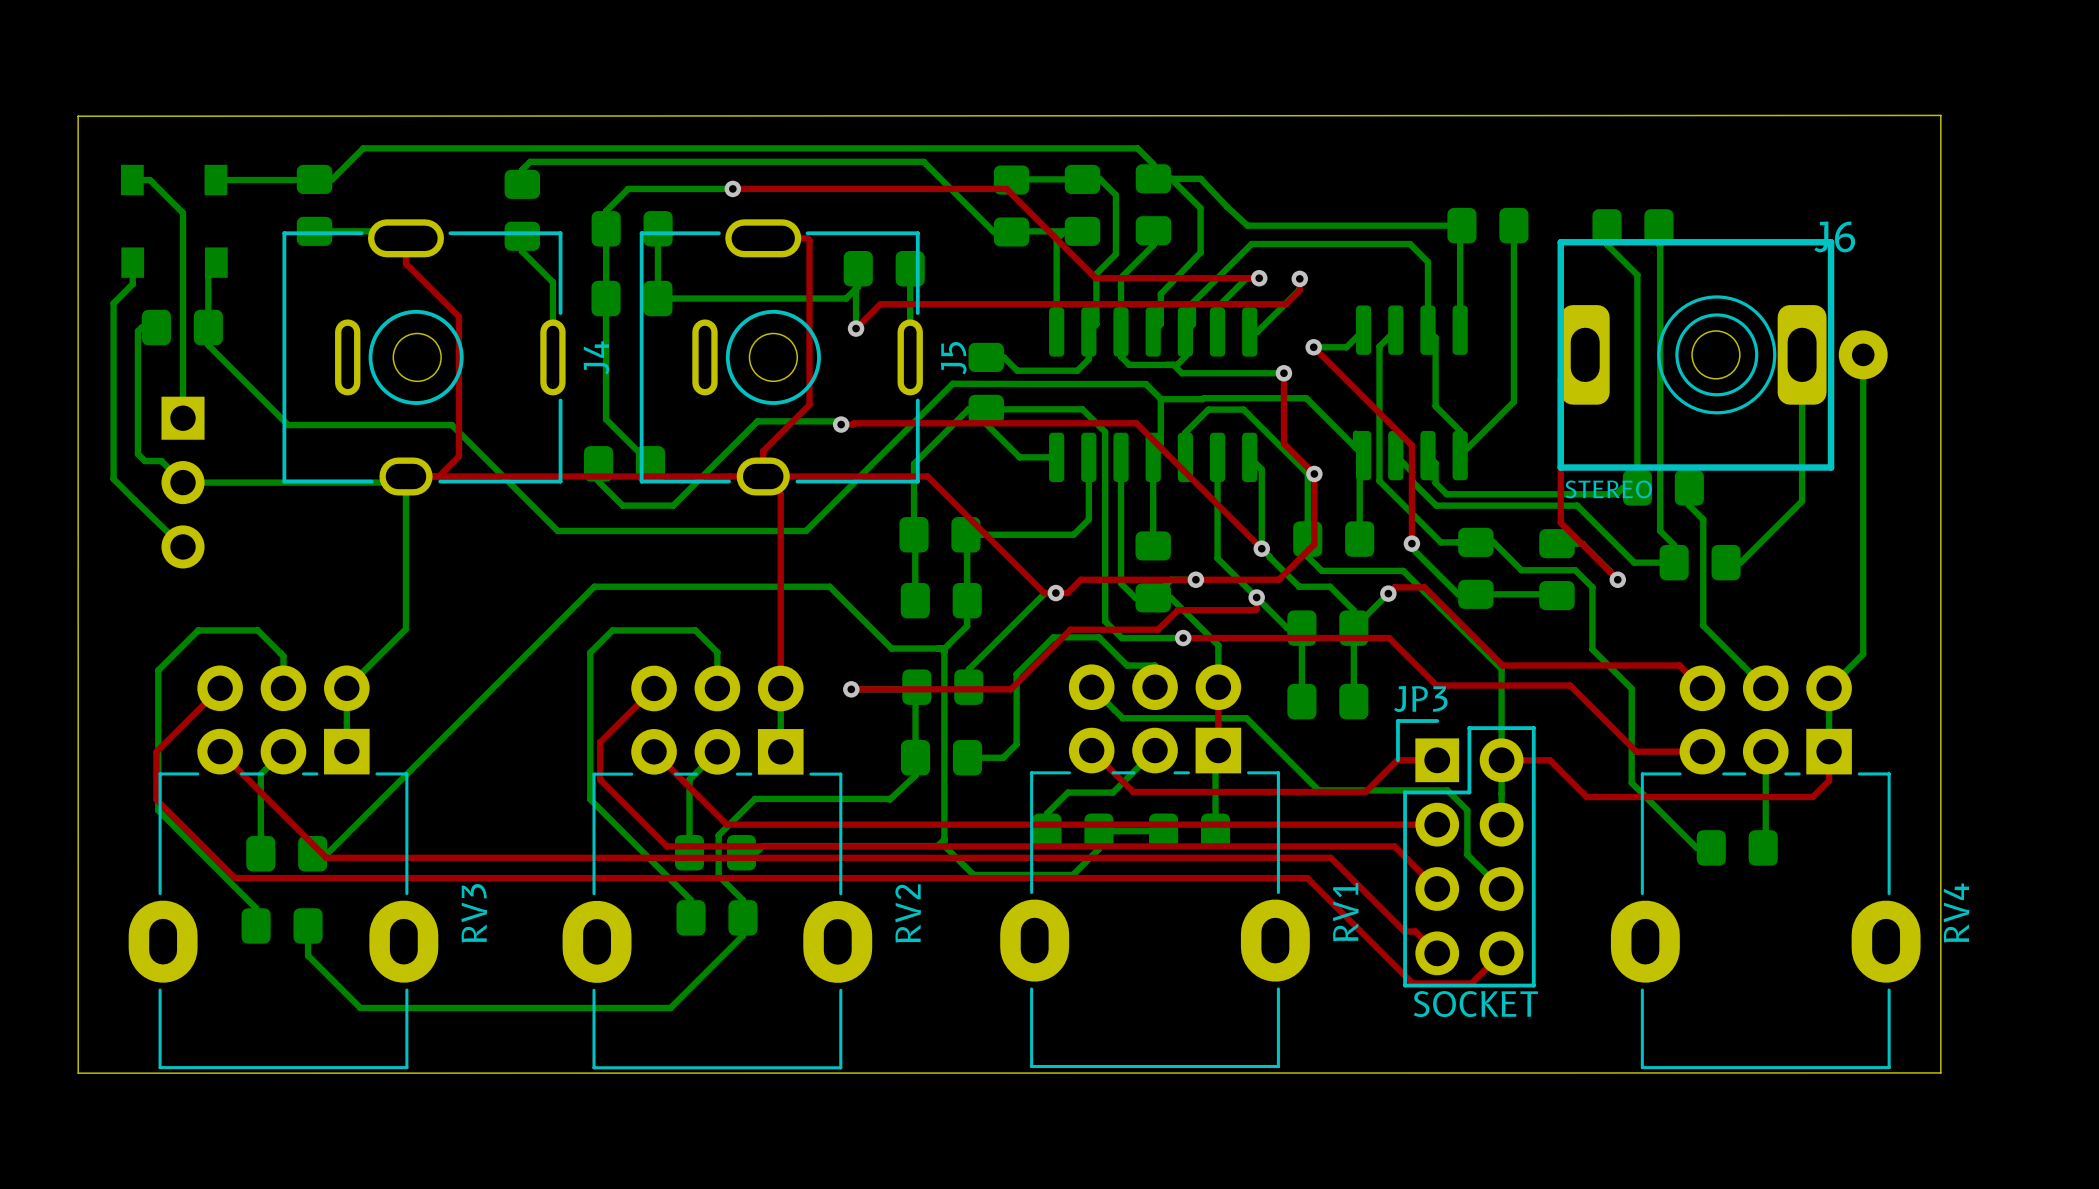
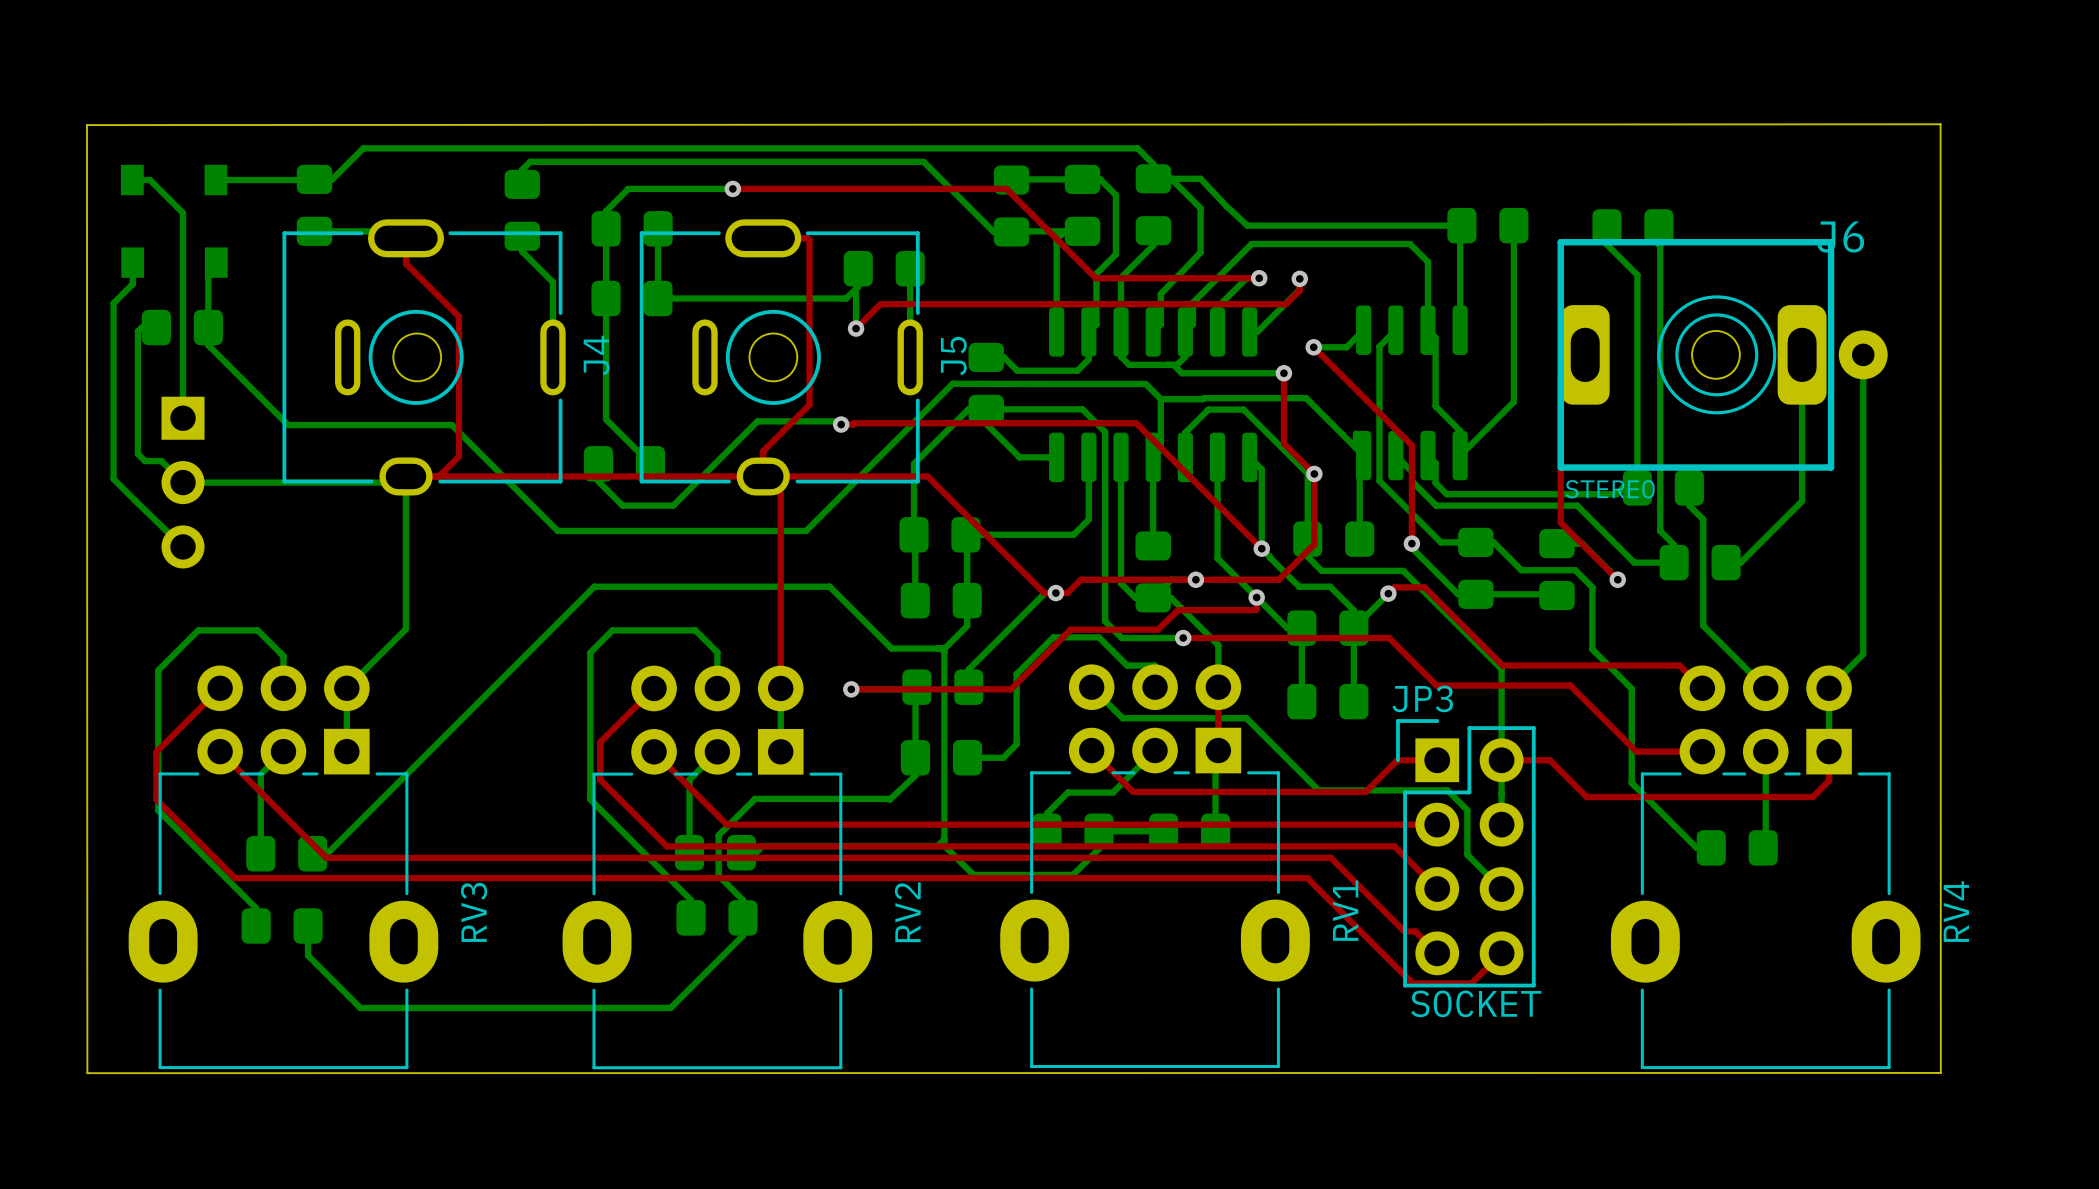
board edge: (1940, 1072) (1940, 115) (78, 116) (78, 1073) (87, 1073) -> (1940, 1072) (1940, 124) (86, 125) (87, 1073)

